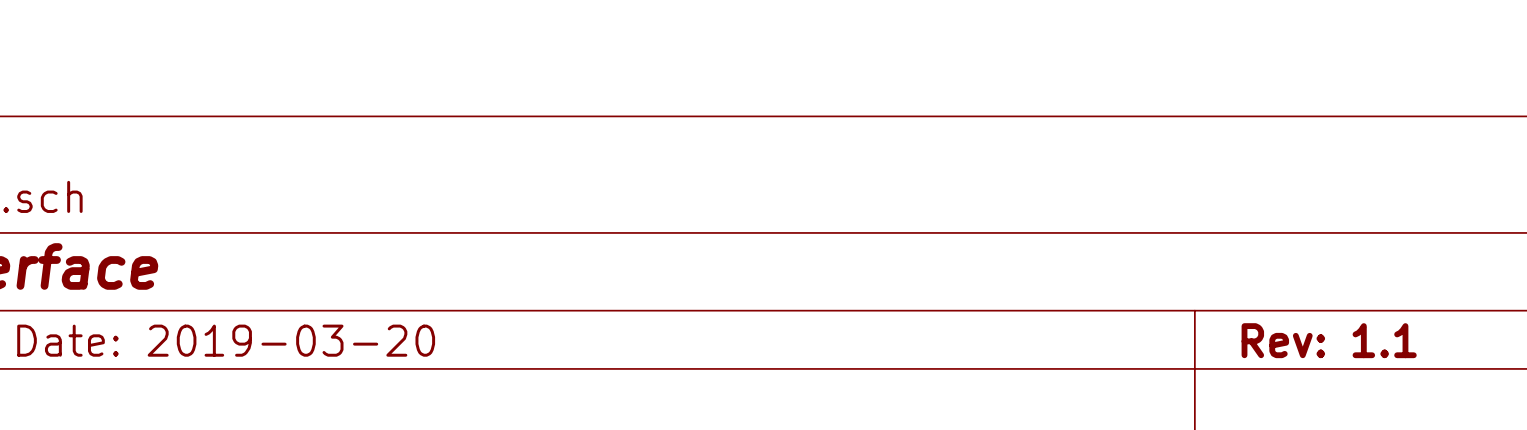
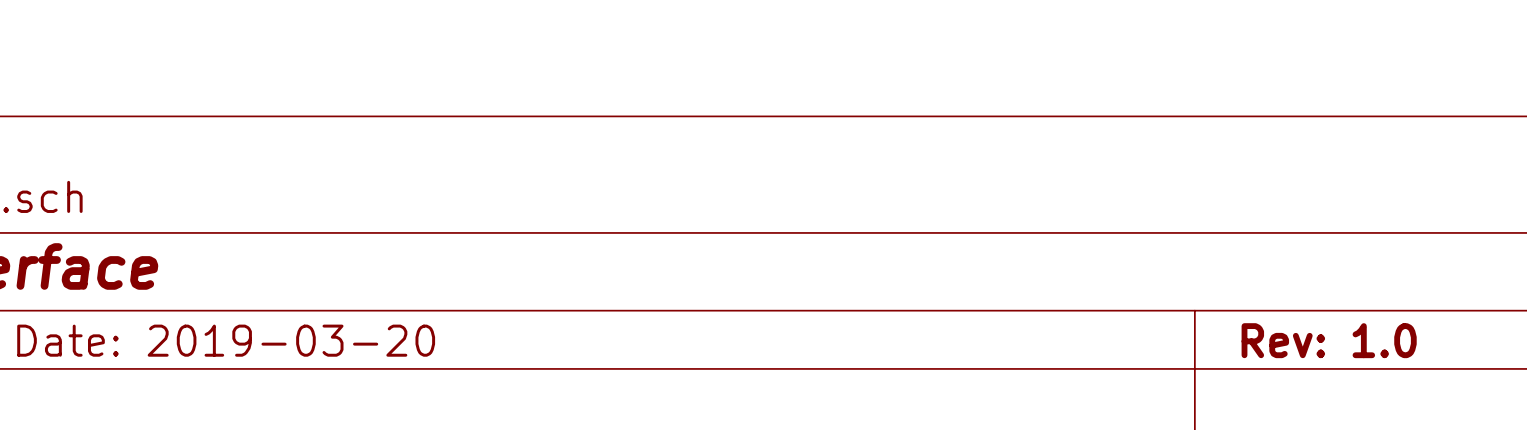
title block: Rev: 1.1 (1329, 340) -> Rev: 1.0 (1329, 340)

